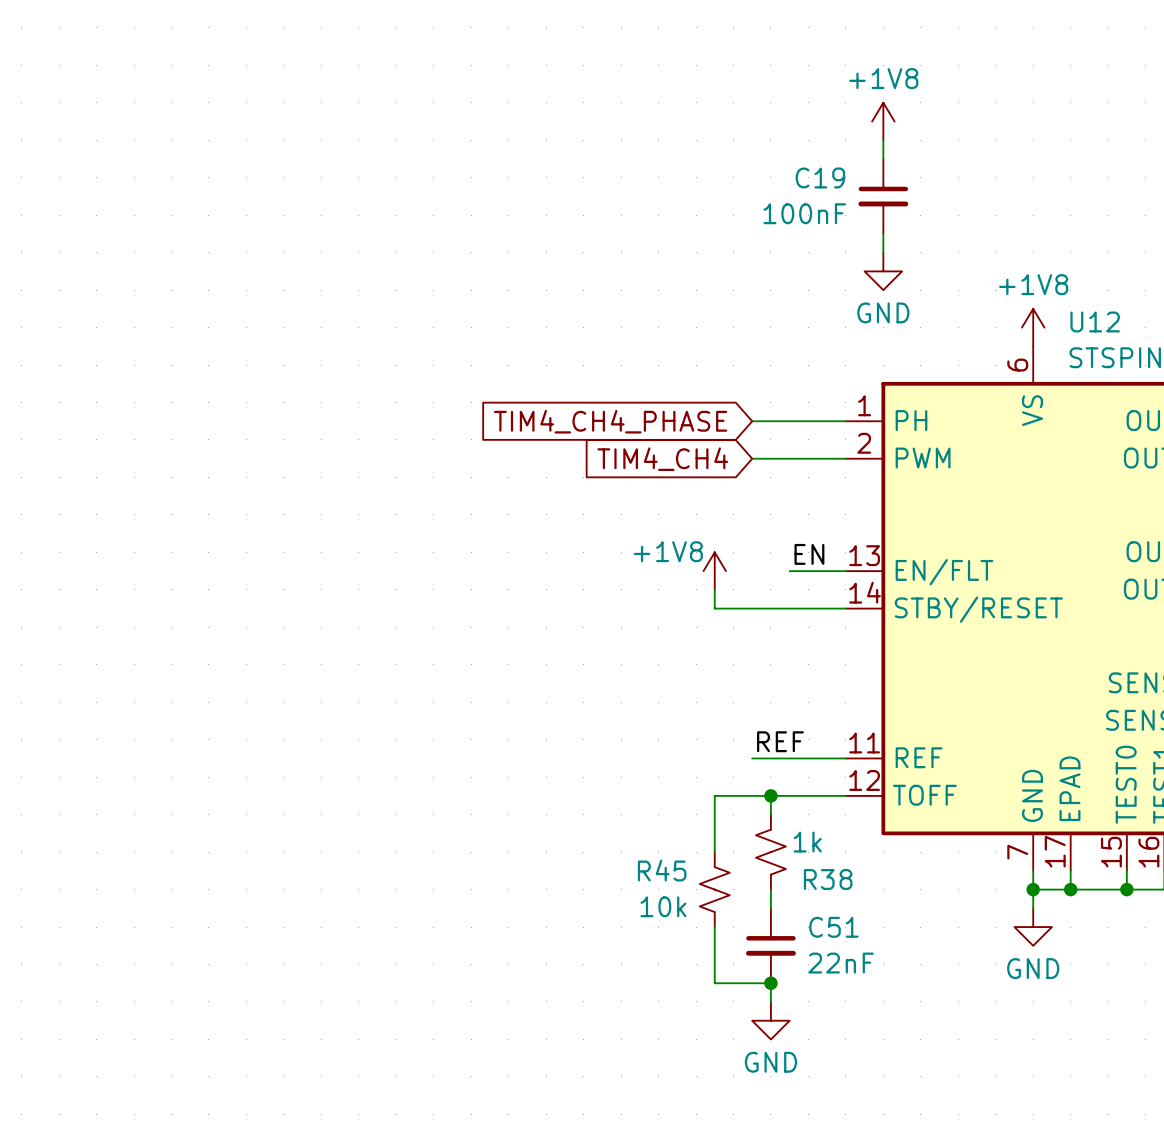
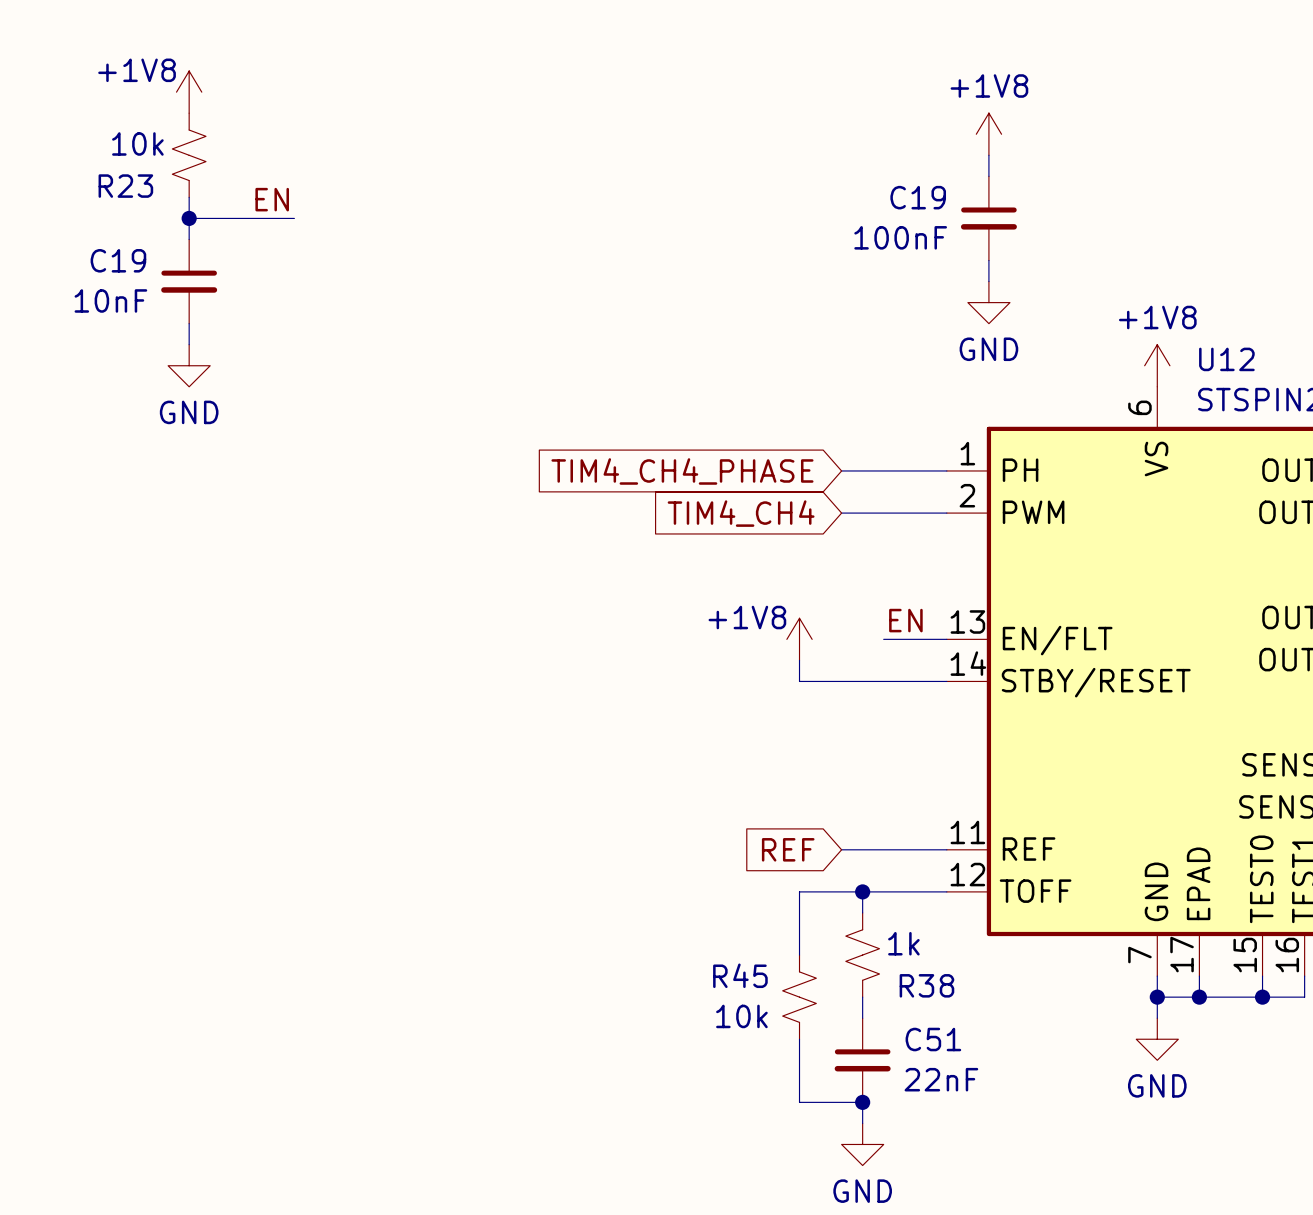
power symbol: none -> +1V8 (189, 92)
R23: none -> 10k (189, 155)
wire: none -> (189, 197) (189, 239)
label: none -> EN (272, 199)
wire: none -> (189, 218) (294, 218)
junction: none -> (189, 218)
C19: none -> 10nF (189, 281)
wire: none -> (189, 323) (189, 344)
power symbol: none -> GND (189, 365)
label: REF (780, 741) -> none
global label: none -> REF (788, 849)

